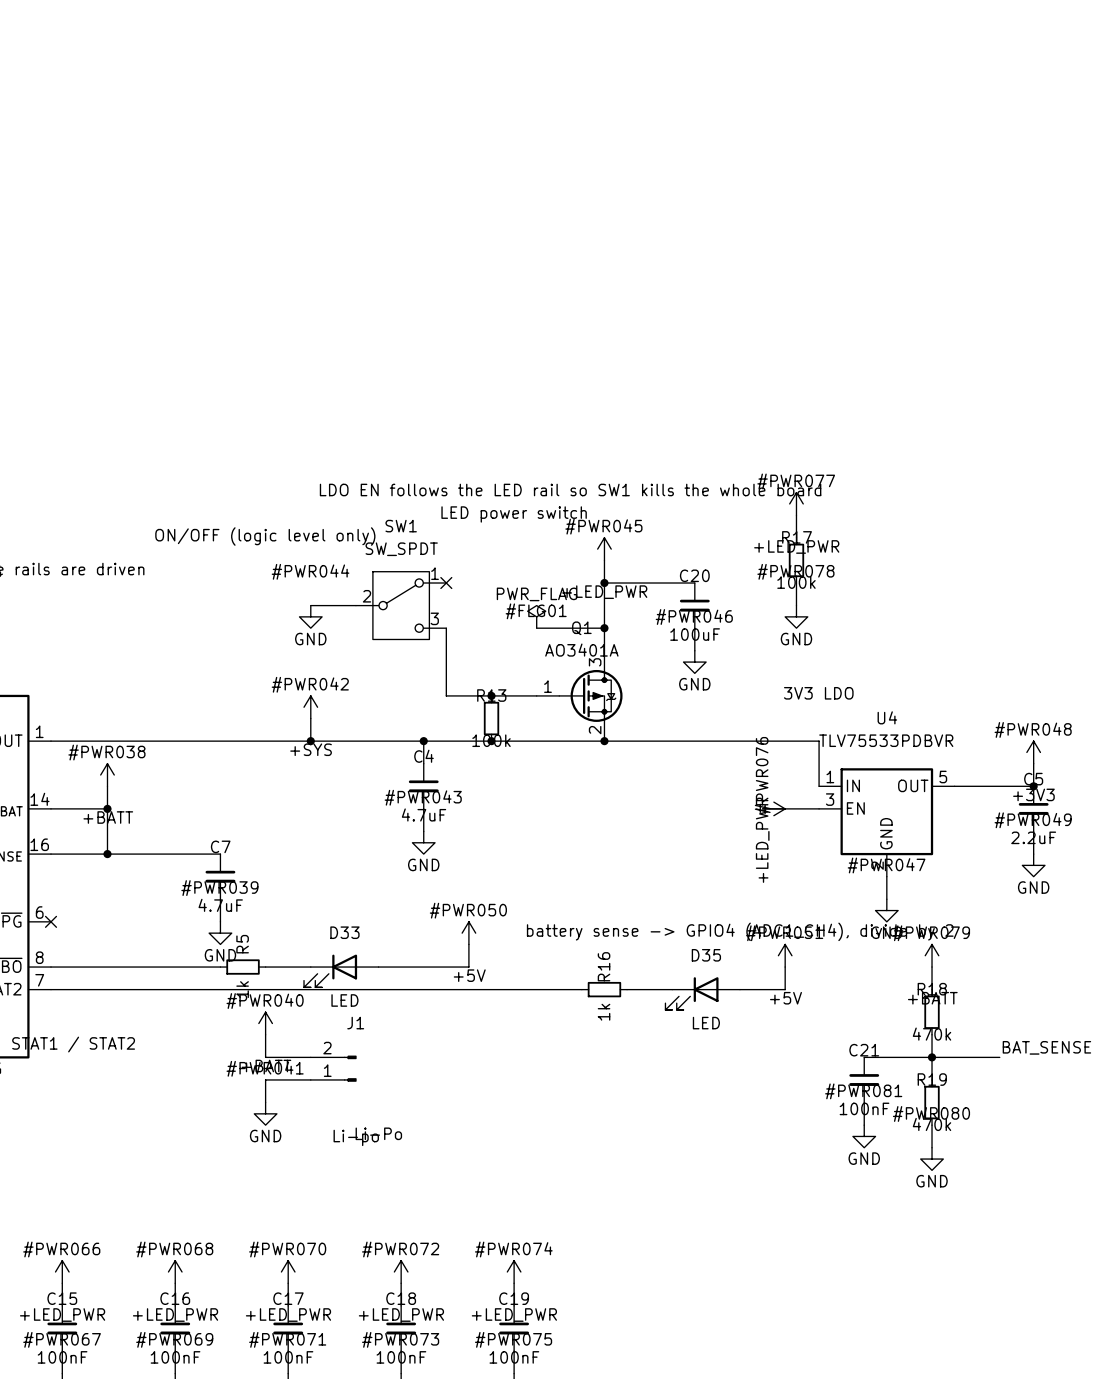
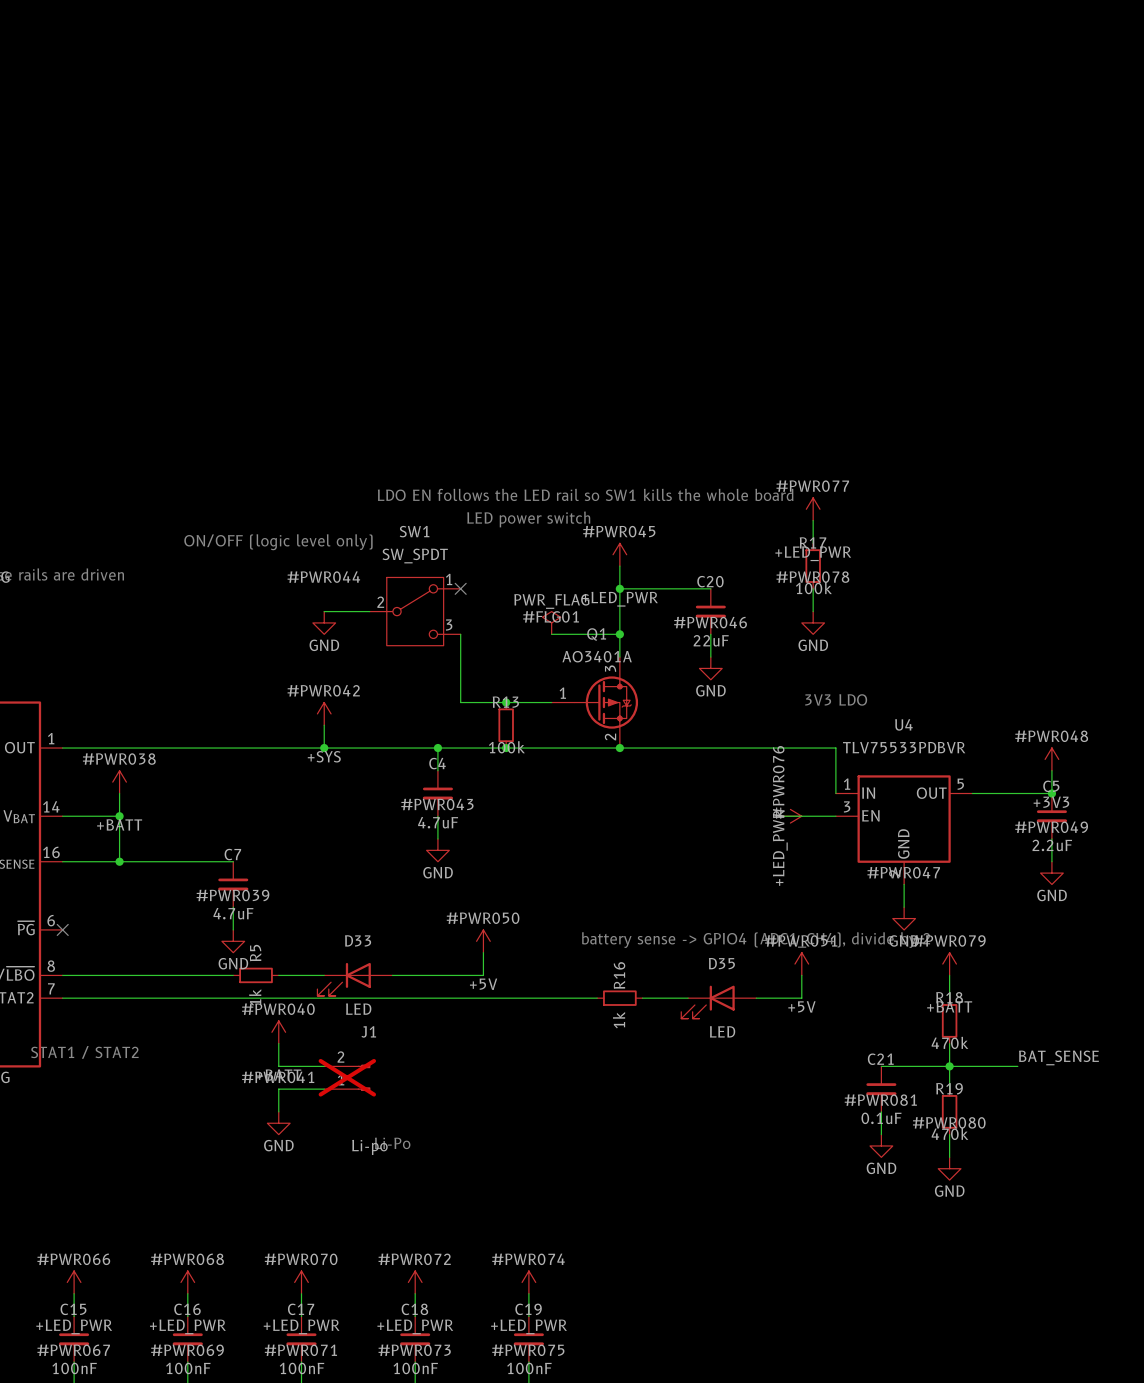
C20 value: 100uF (695, 634) -> 22uF (711, 640)
J1 do-not-place cross: none -> (347, 1077)
C21 value: 100nF (864, 1108) -> 0.1uF (881, 1118)

